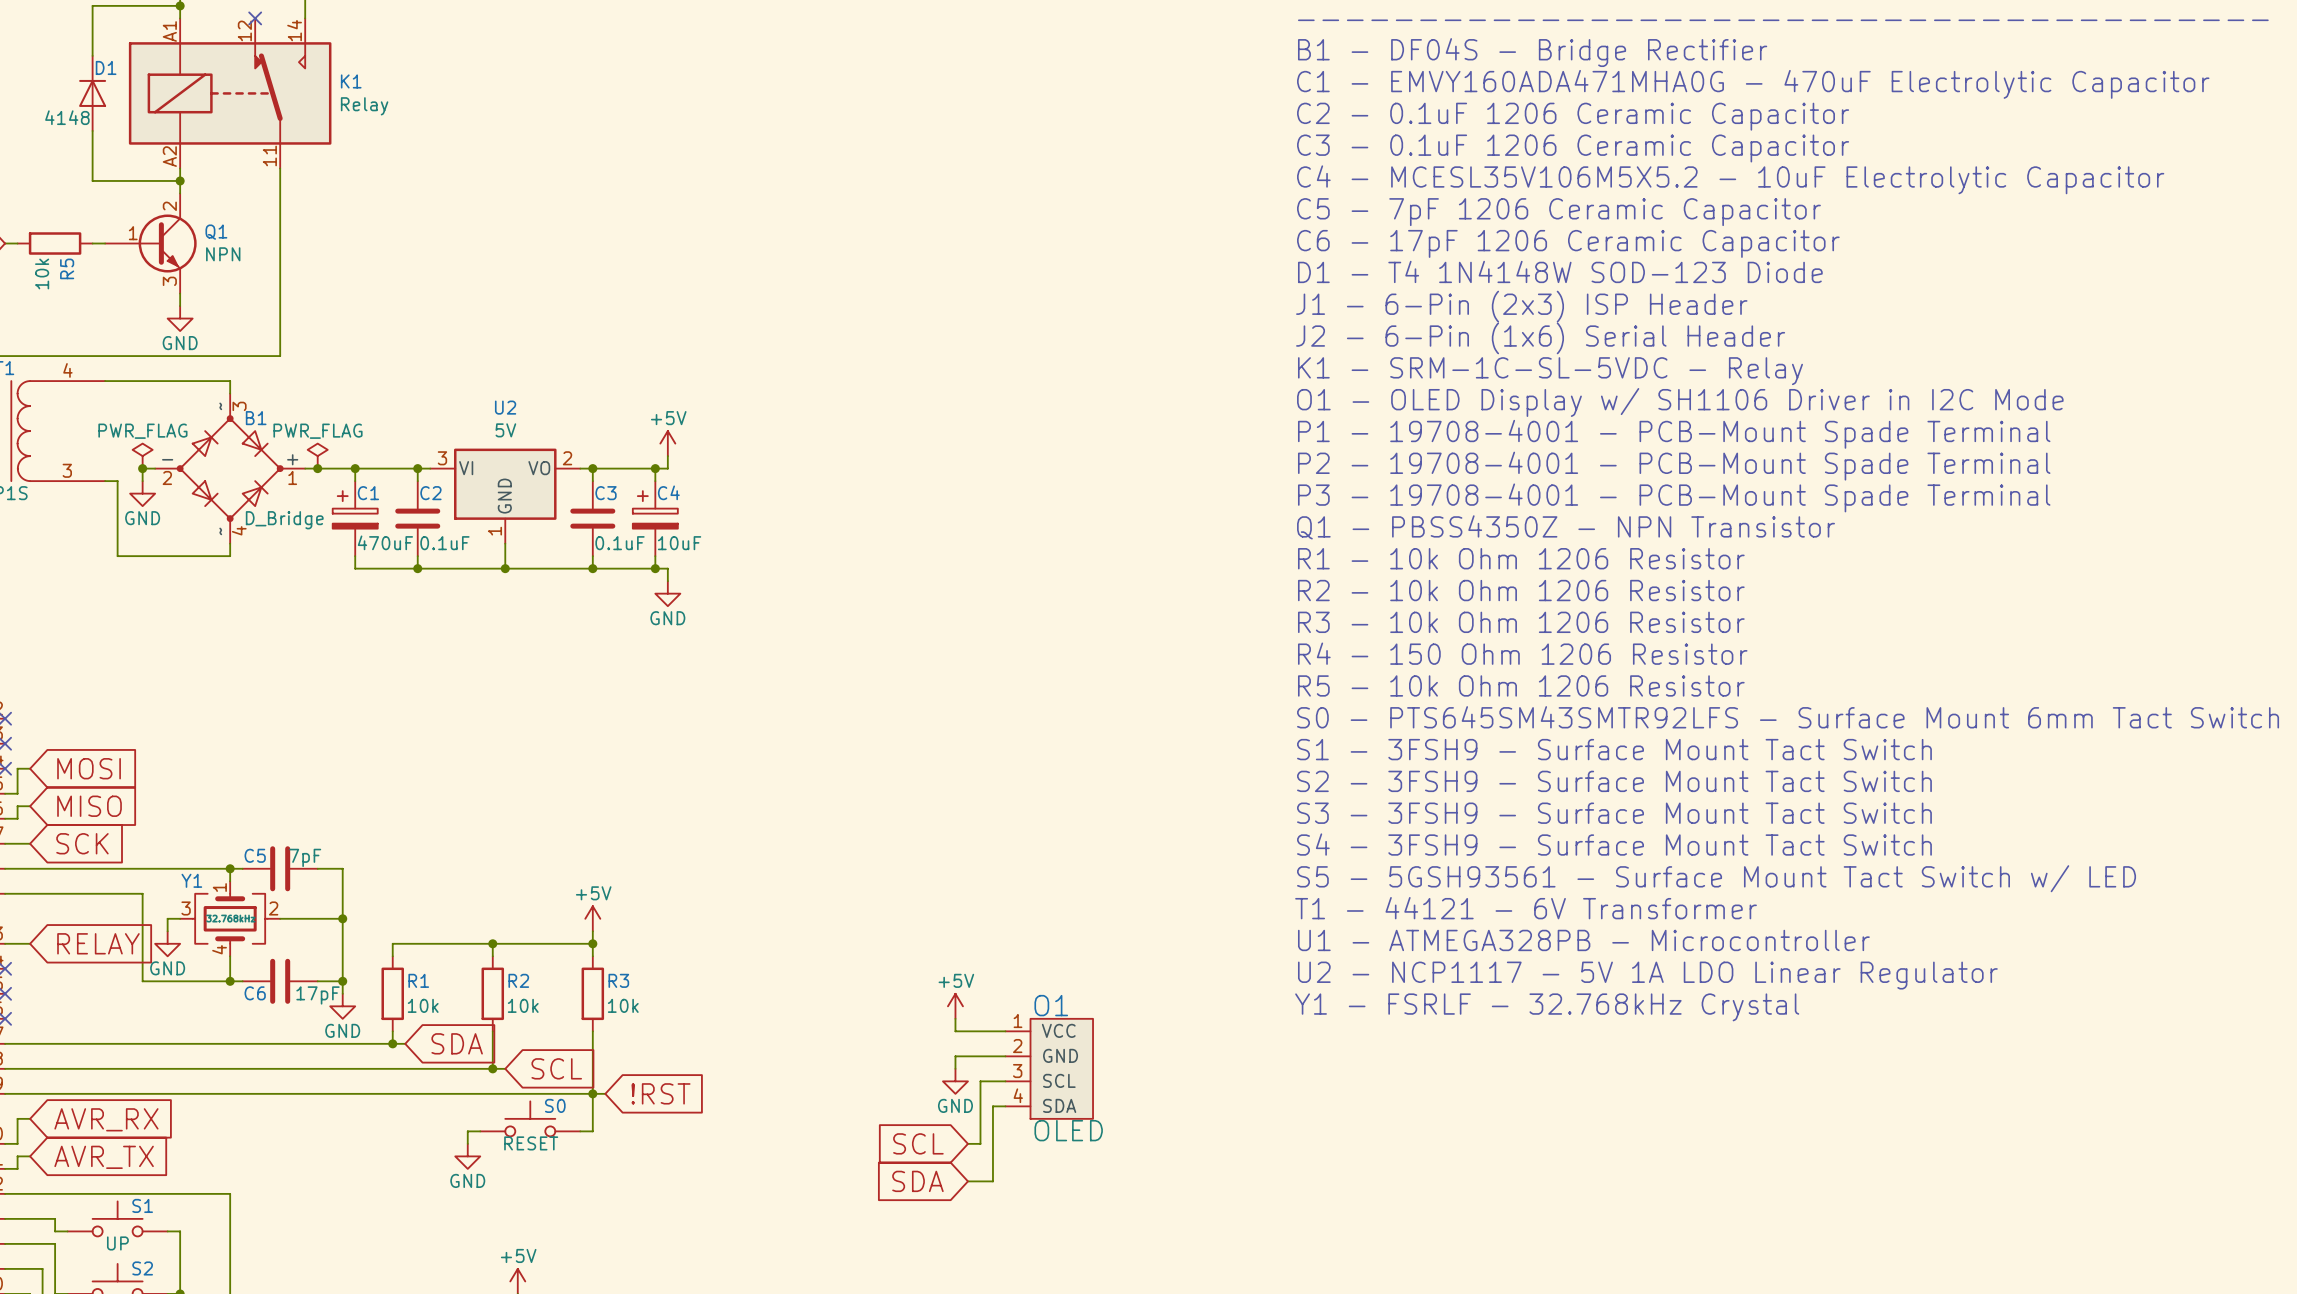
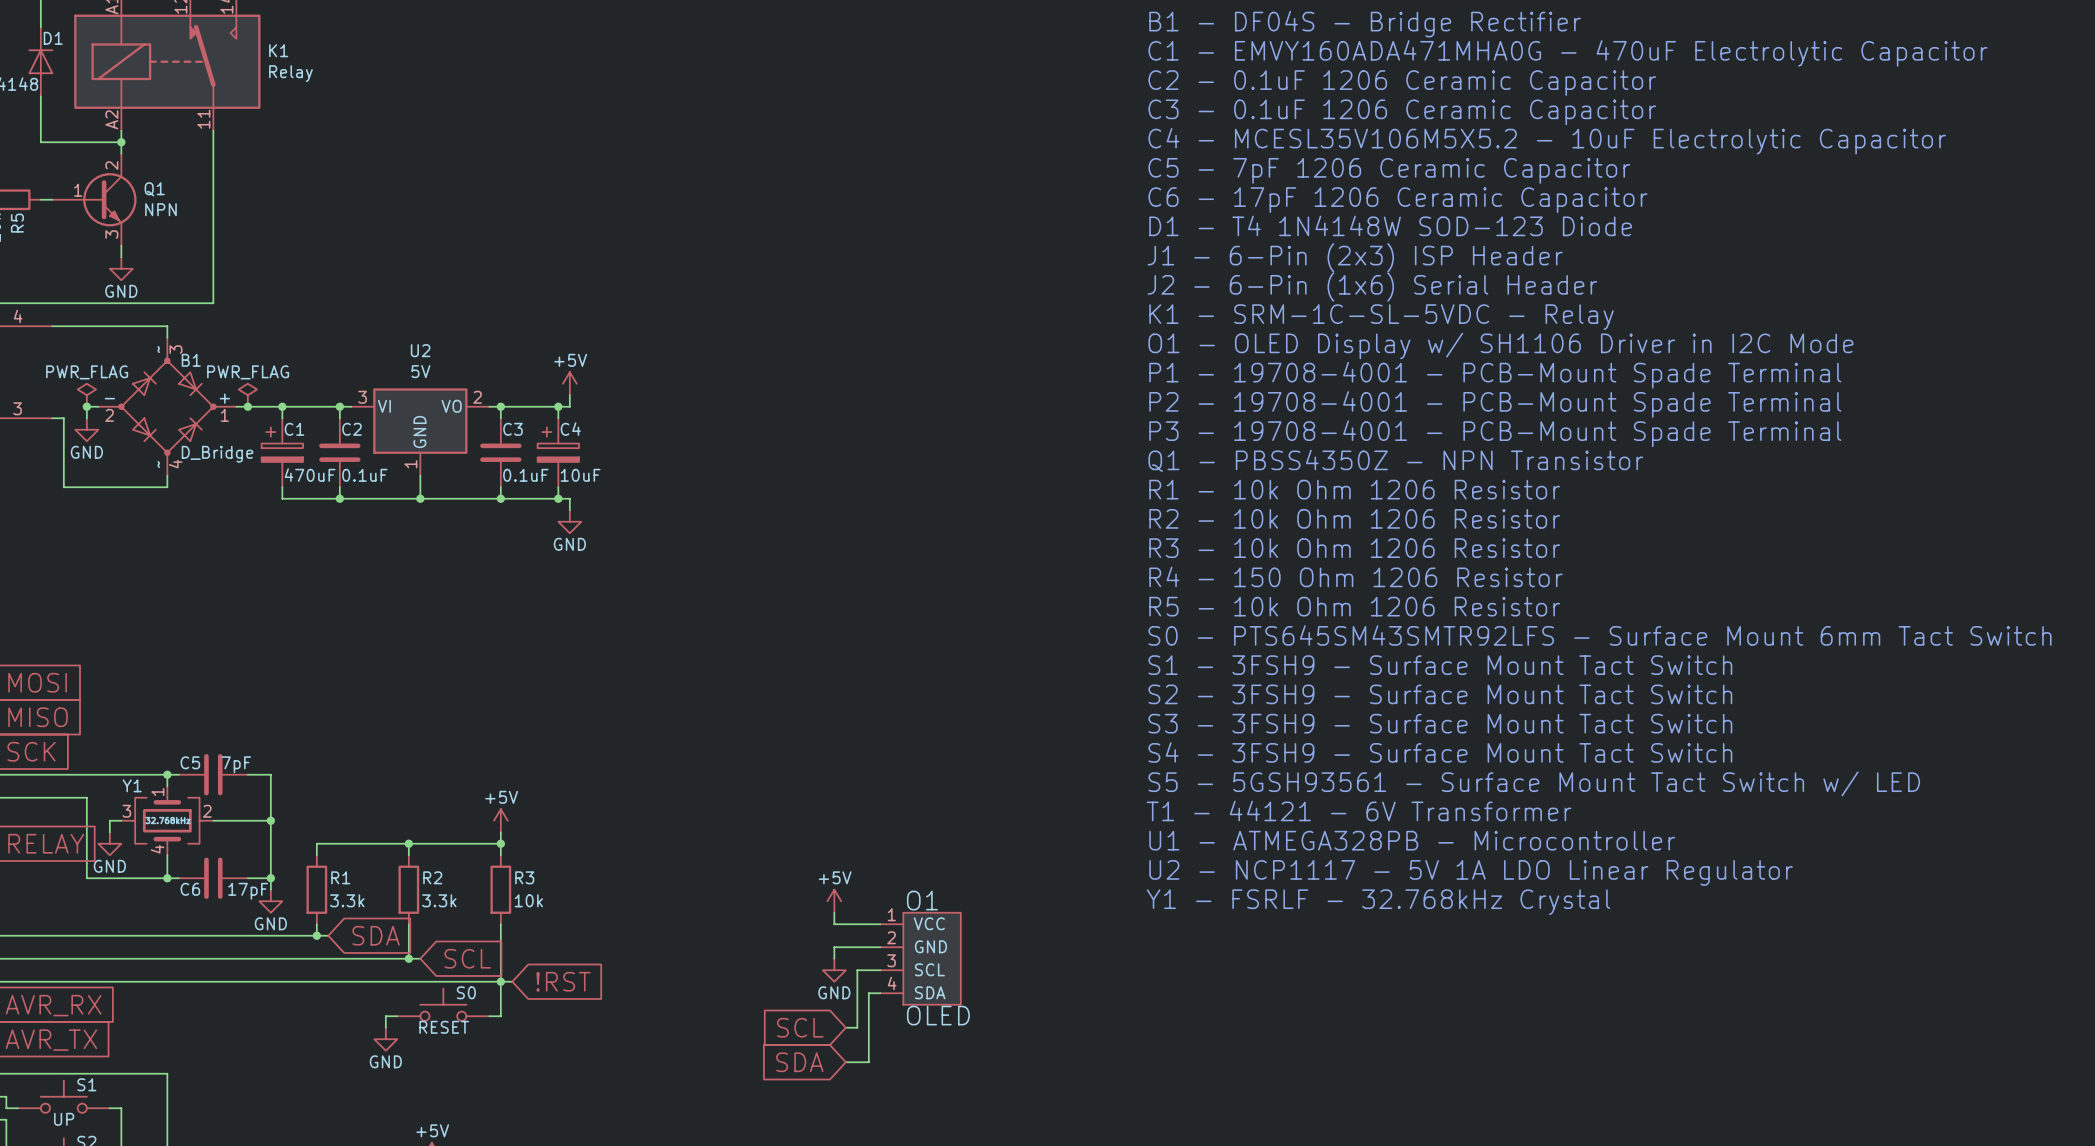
R1 value: 10k (423, 1005) -> 3.3k (347, 900)
R2 value: 10k (523, 1005) -> 3.3k (439, 900)

